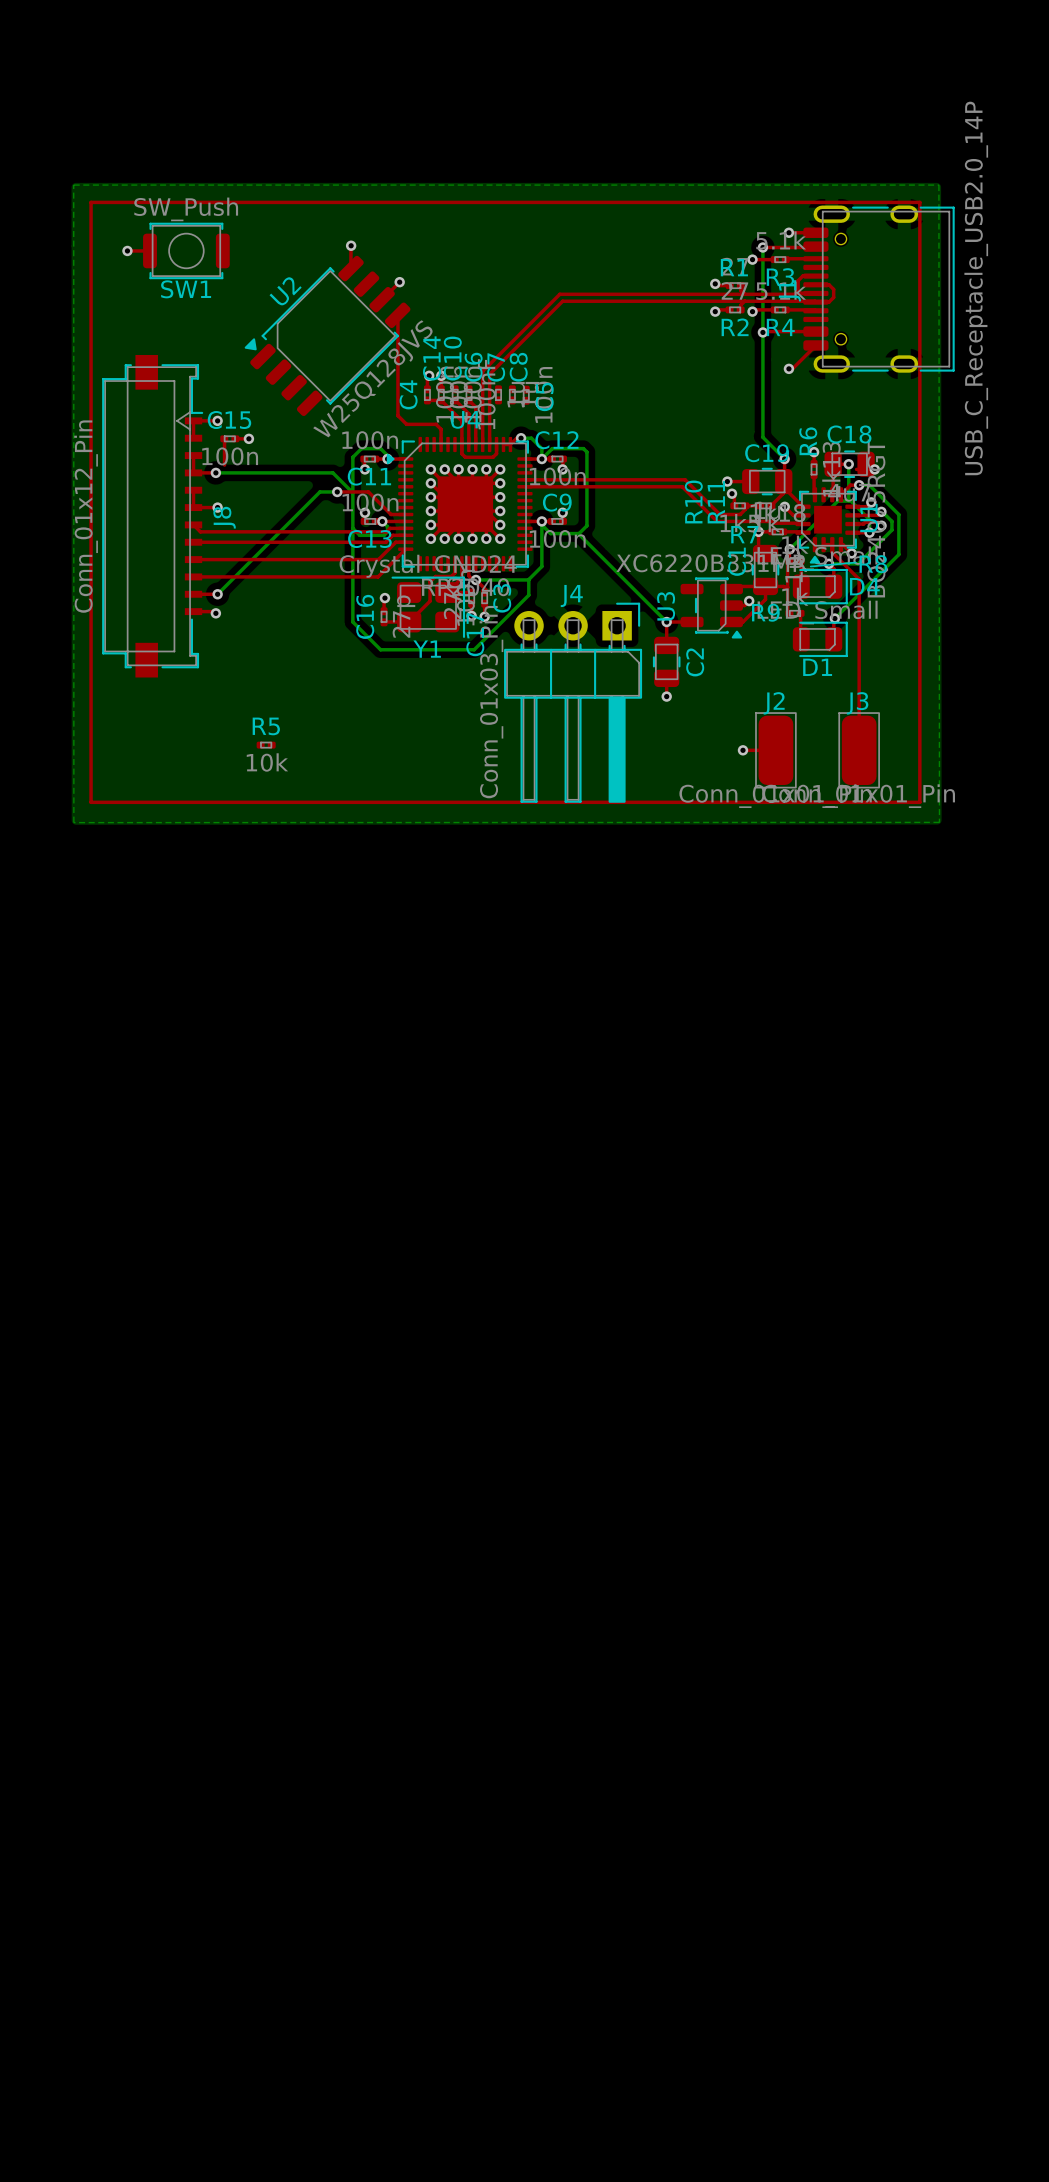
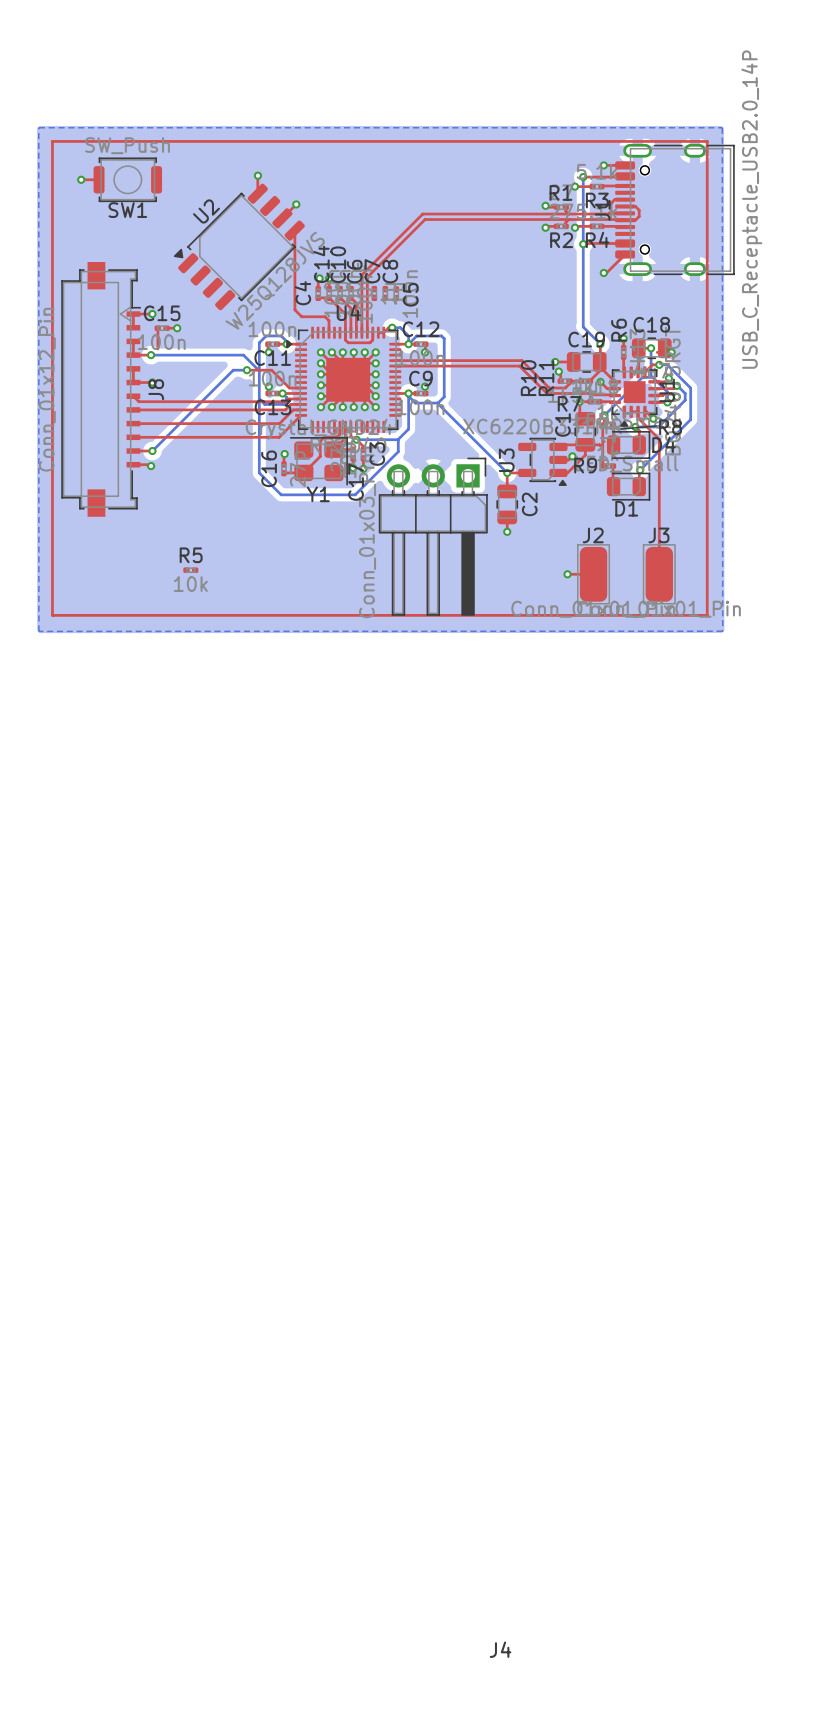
J4 name position: J4 (571, 596) -> J4 (500, 1649)

